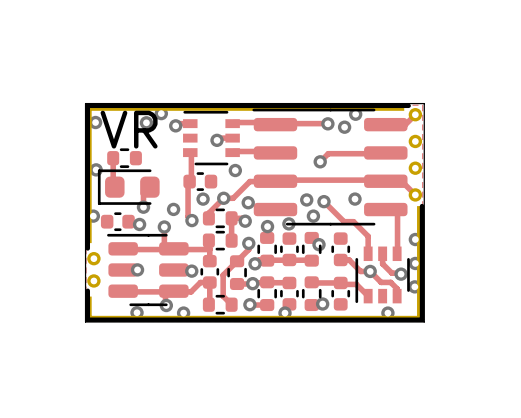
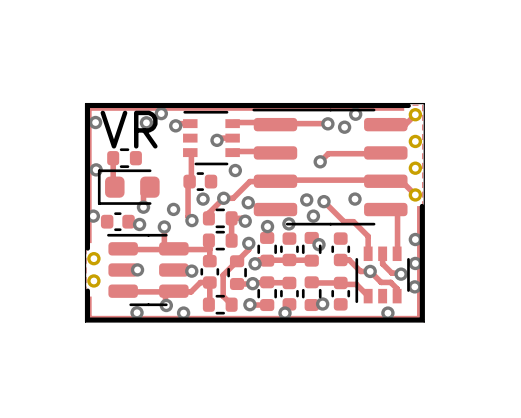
part footprint: [85, 103, 425, 322] -> [85, 103, 425, 322]

